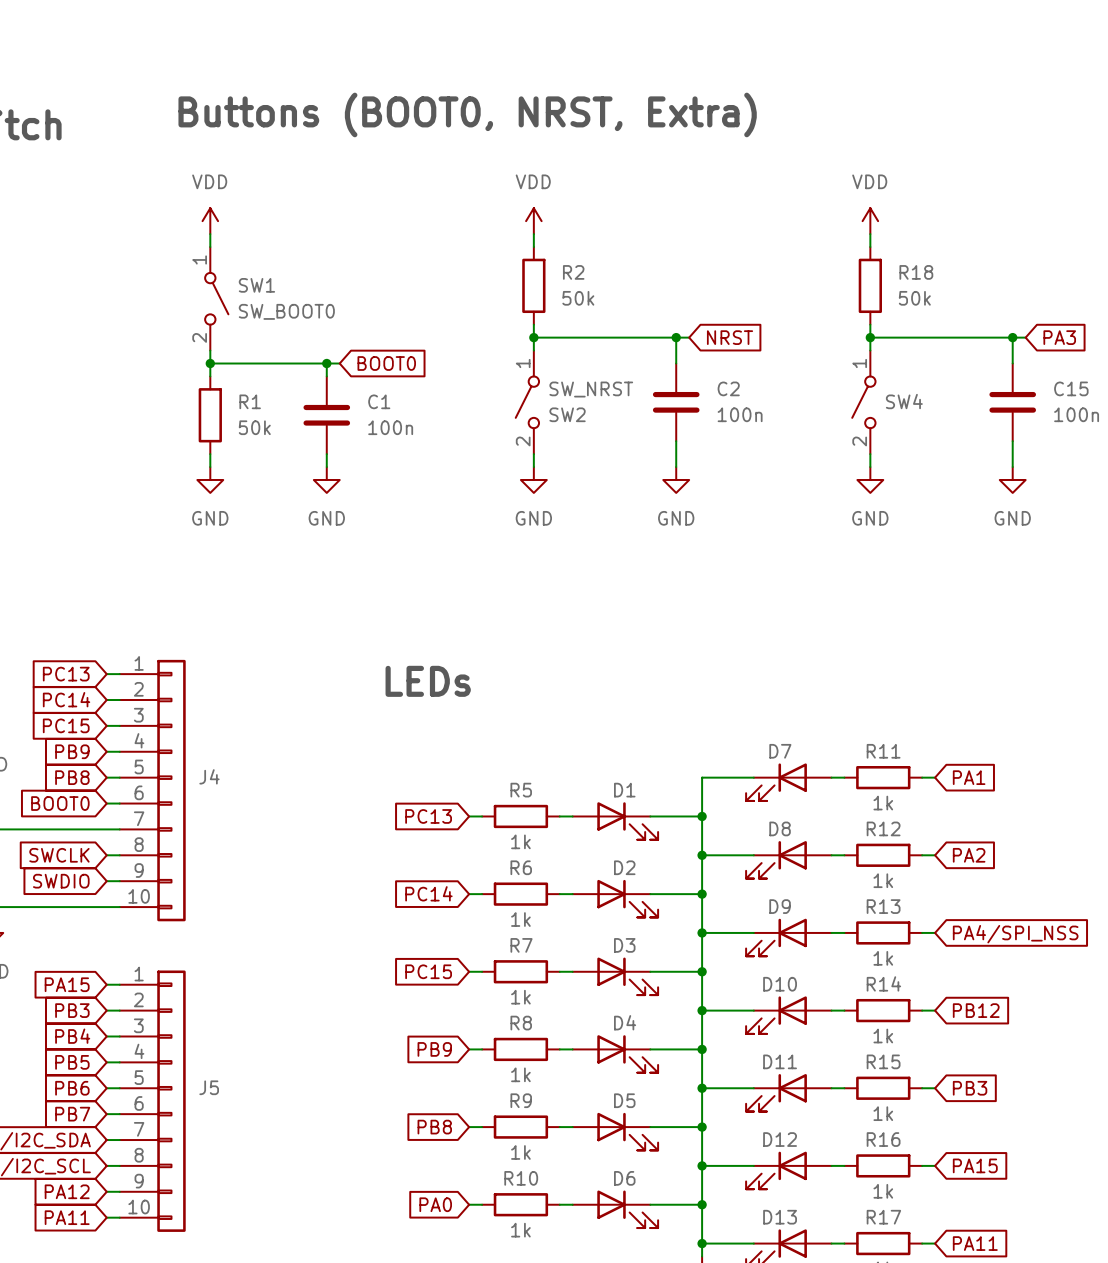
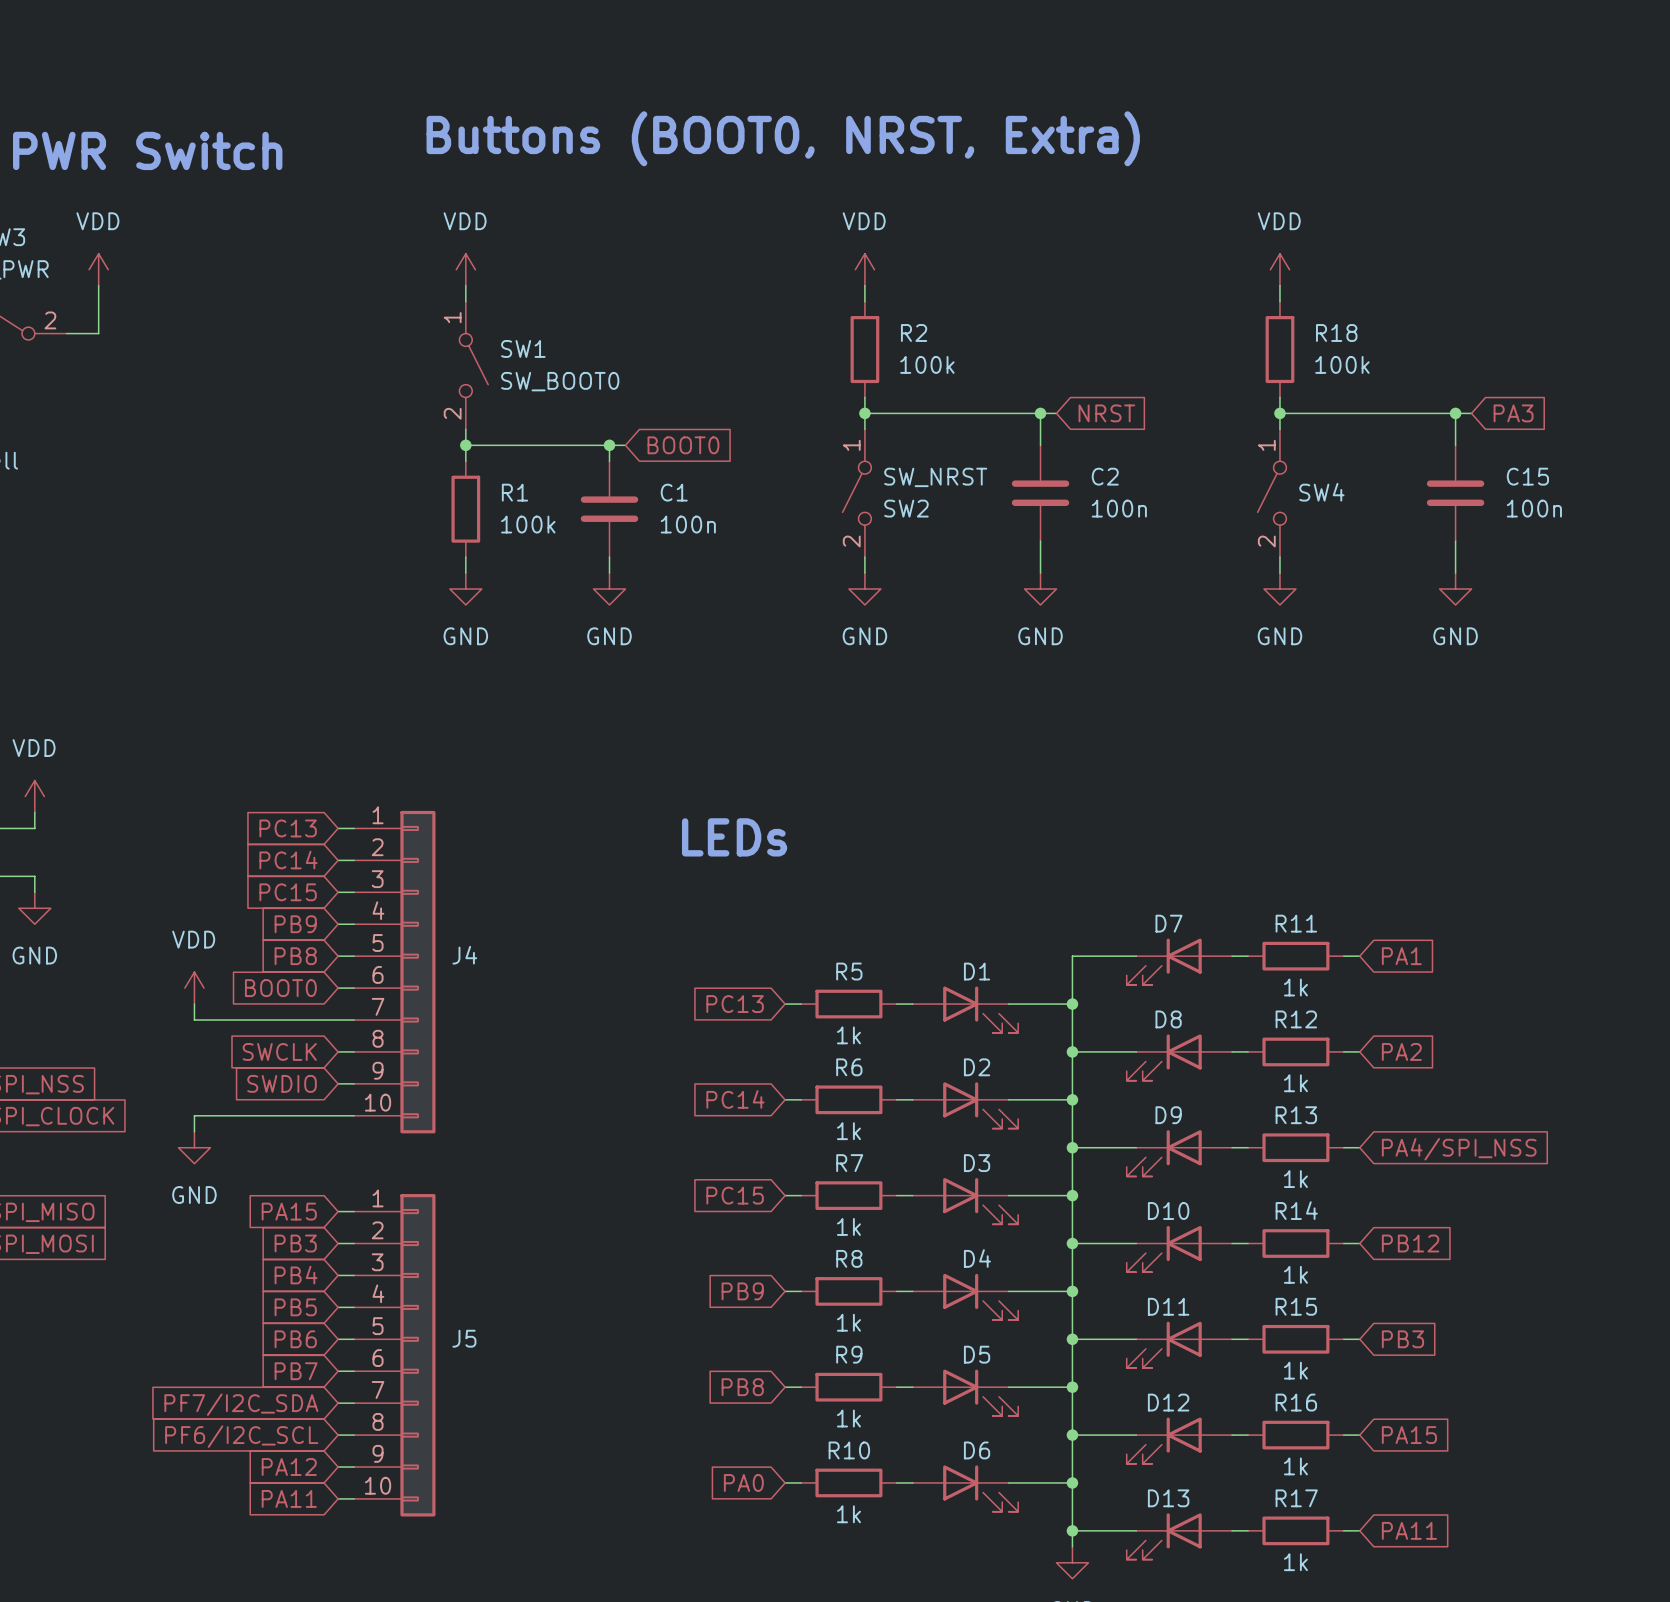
R2 value: 50k (578, 298) -> 100k (927, 364)
R18 value: 50k (914, 298) -> 100k (1342, 364)
R1 value: 50k (254, 427) -> 100k (528, 524)

